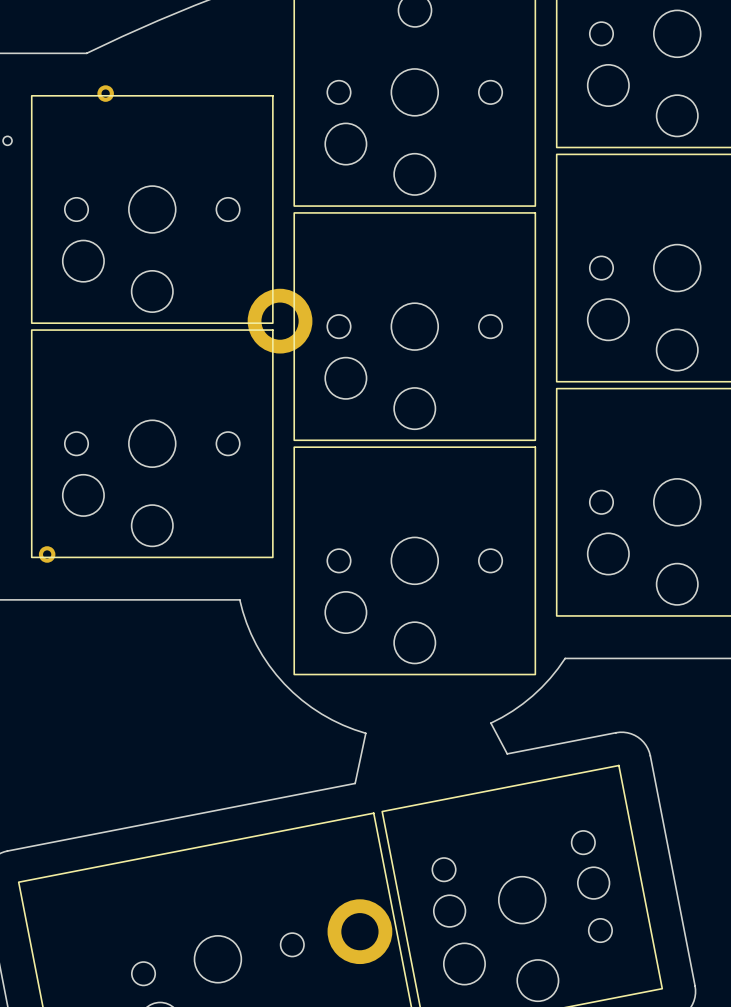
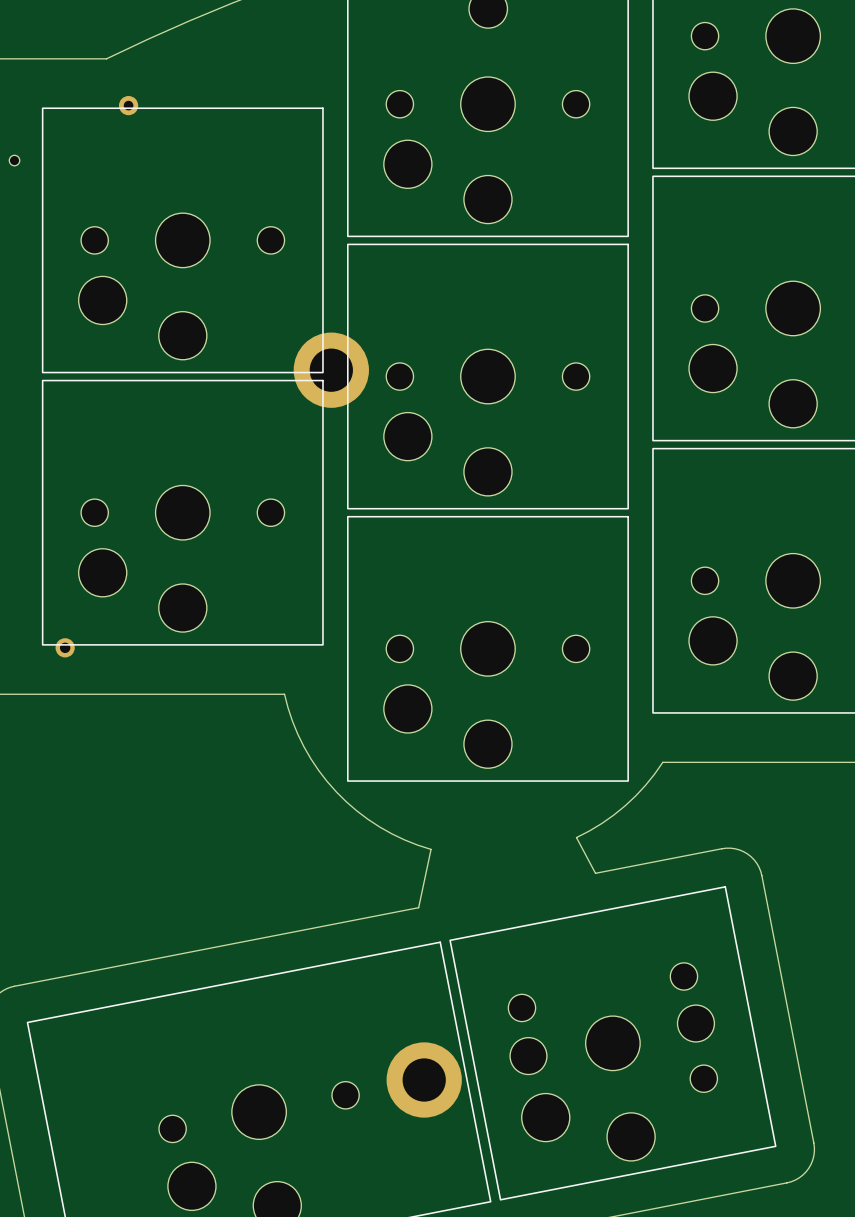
part footprint: [38, 546, 56, 563] -> [55, 638, 75, 658]

